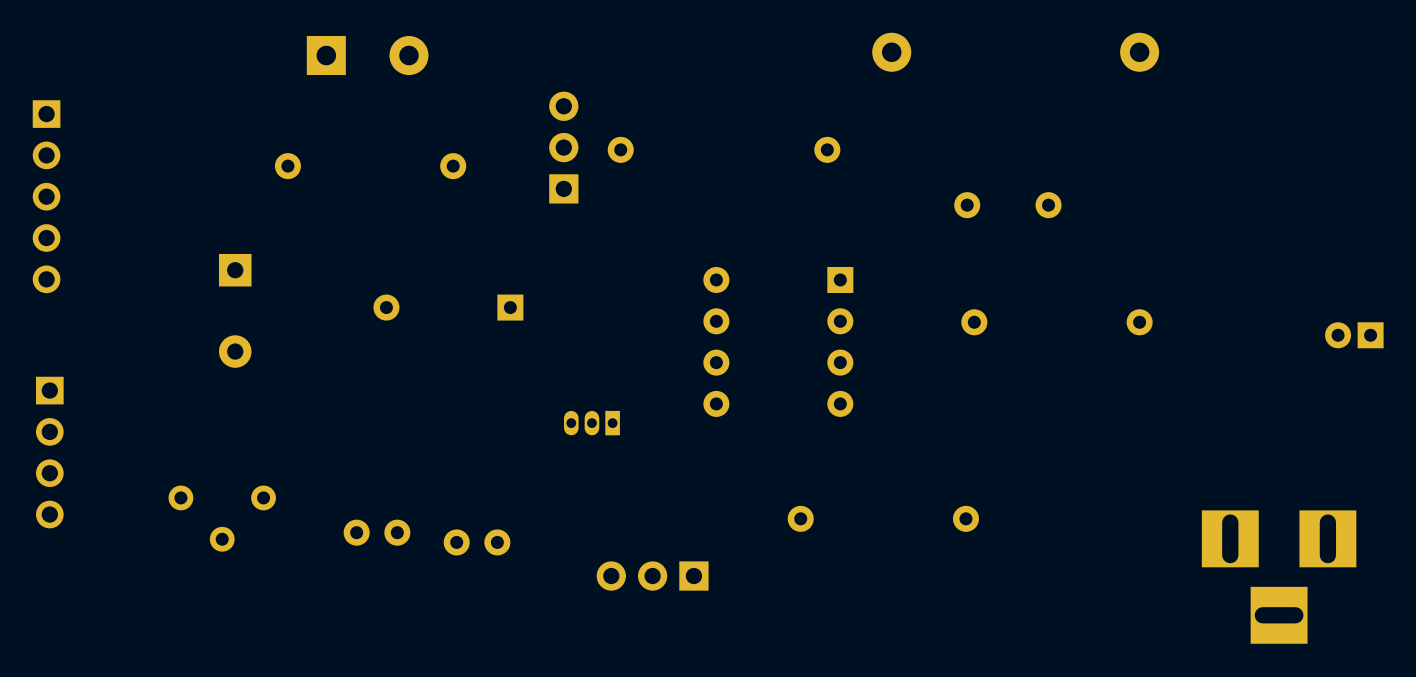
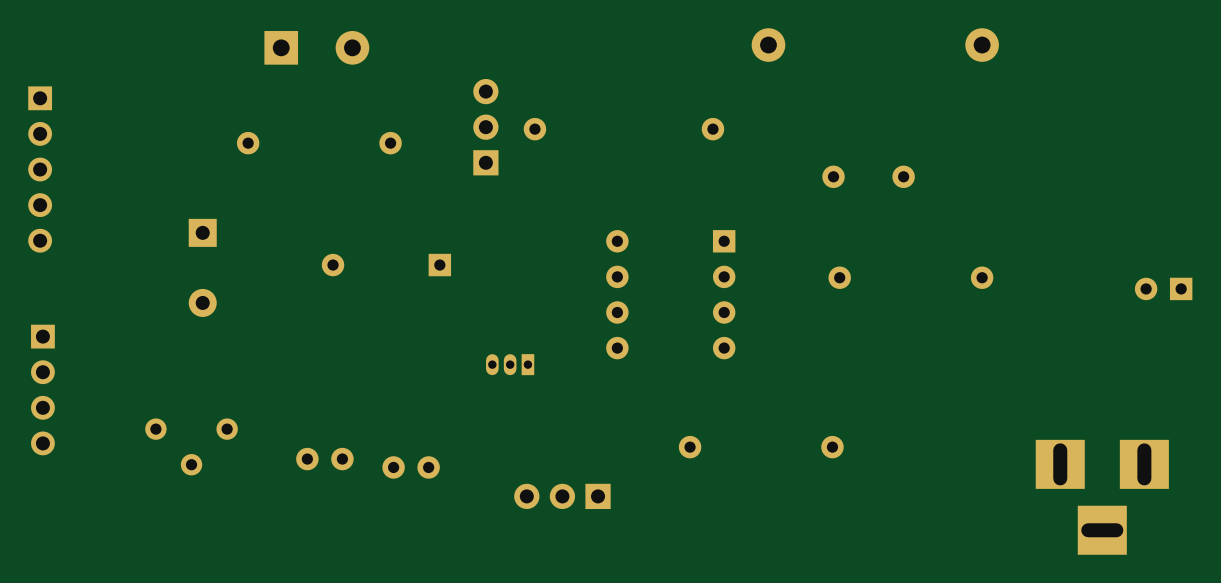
part footprint: [1325, 322, 1384, 349] -> [1134, 277, 1193, 301]

